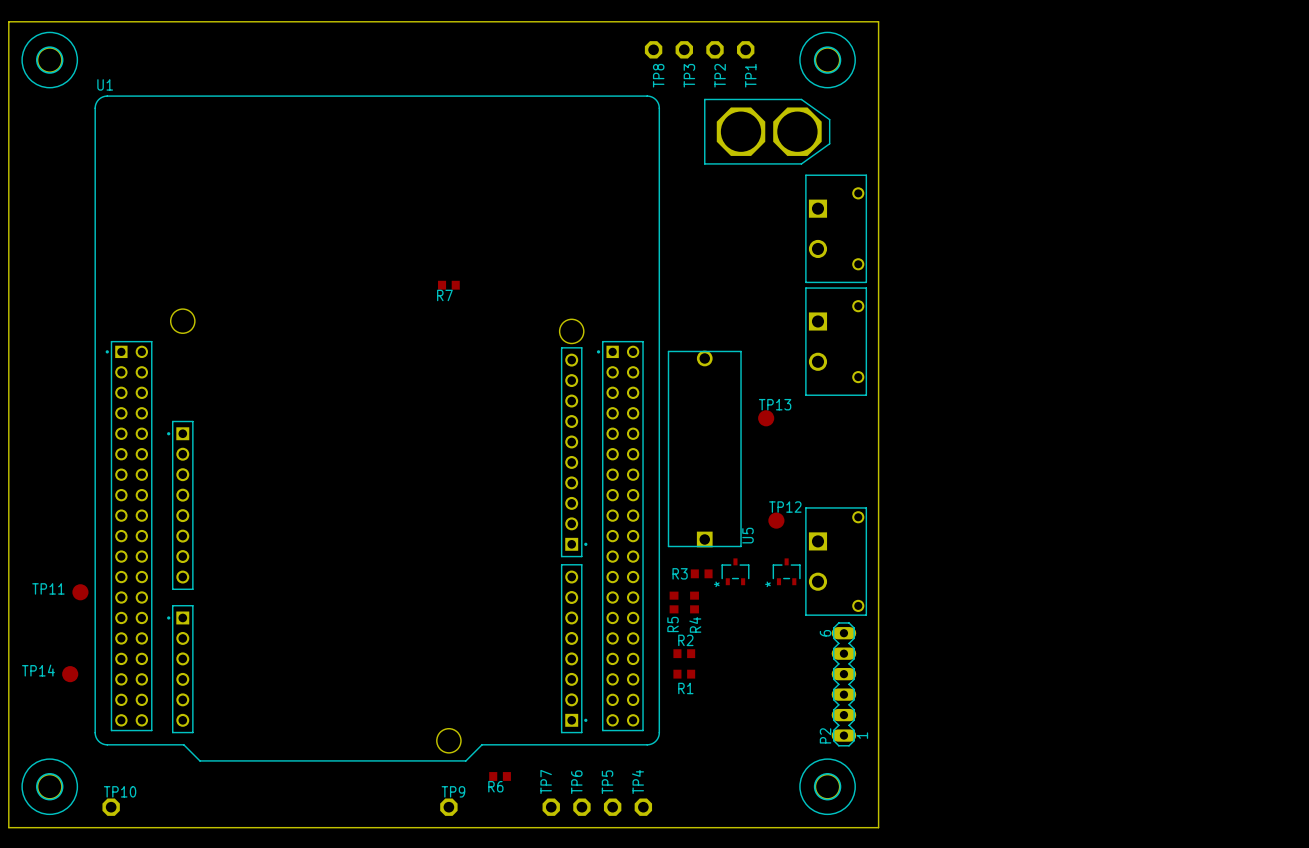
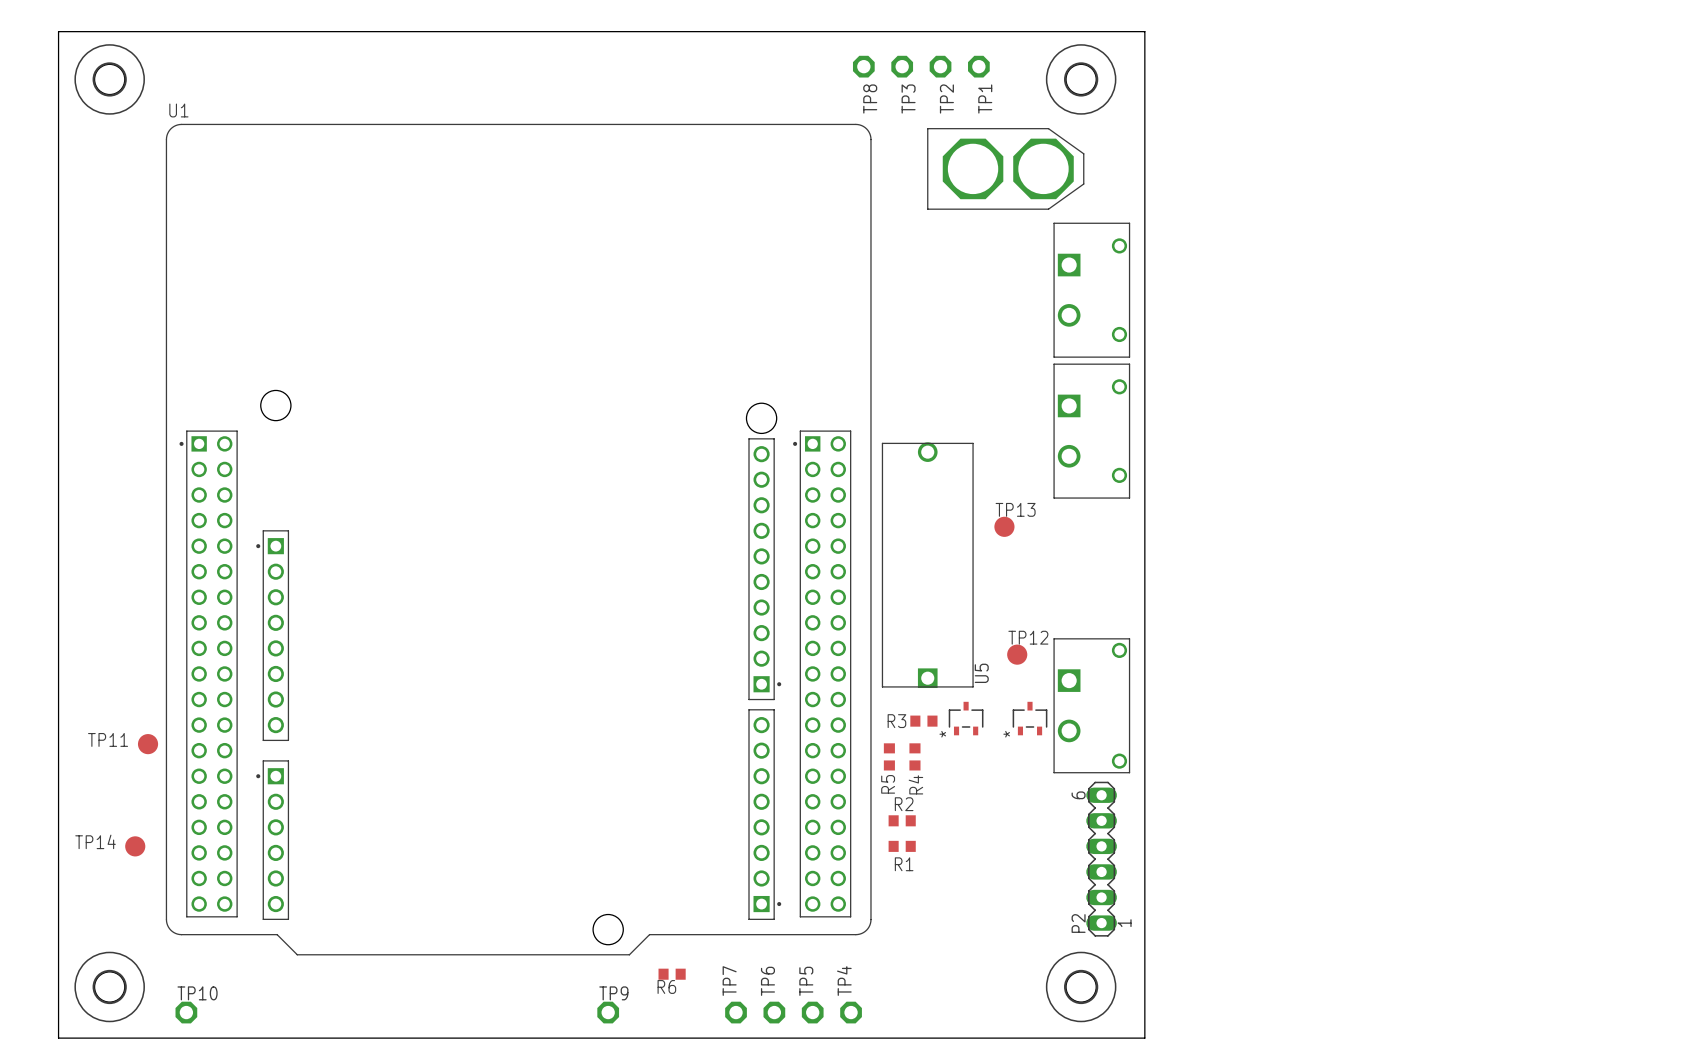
R7: (448, 285) -> none

